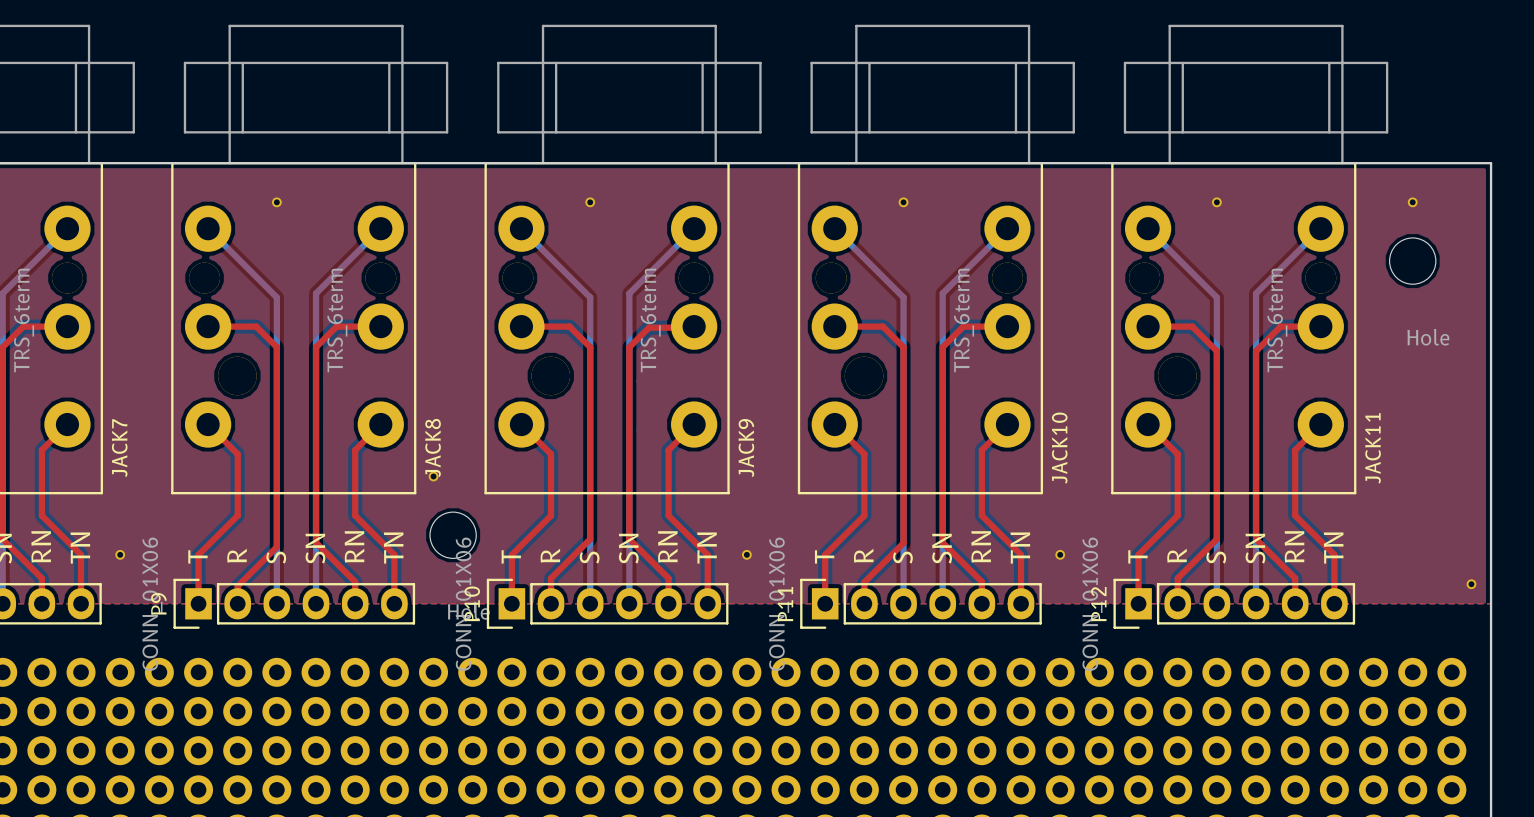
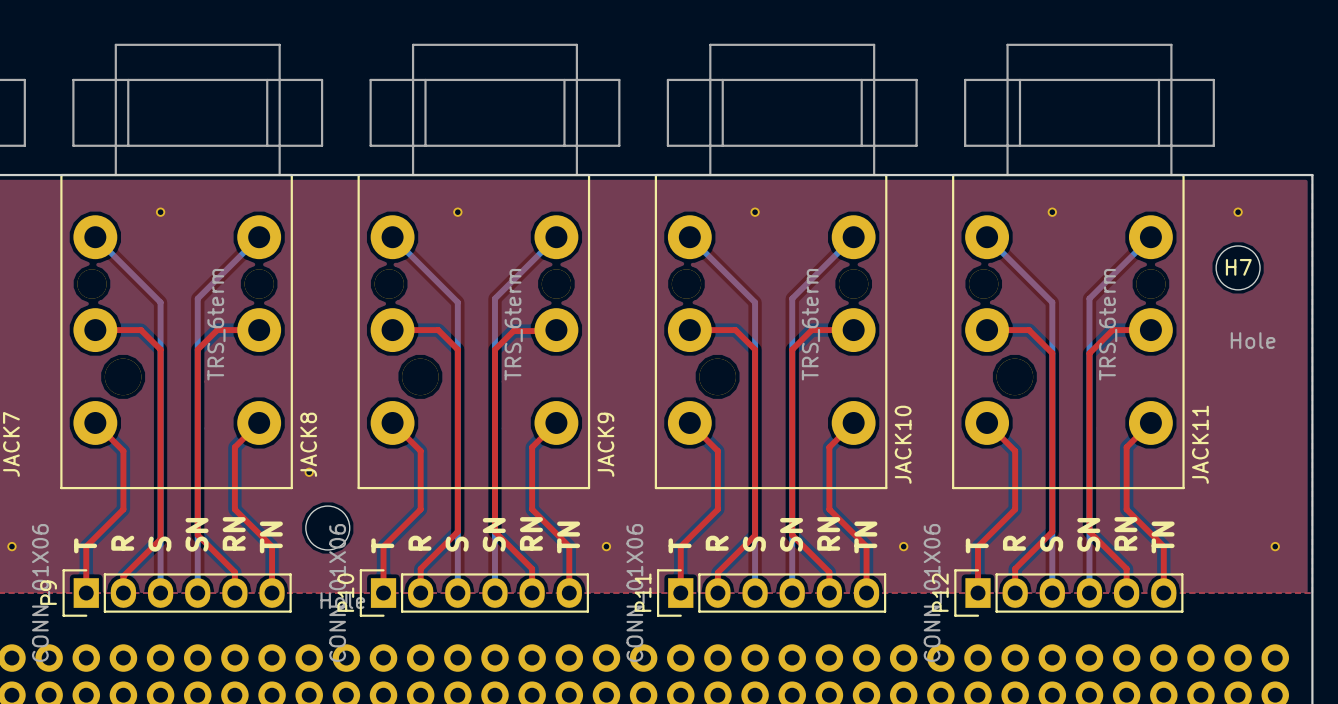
H7 name: none -> H7 (1238, 267)
part position: (1471, 584) -> (1275, 546)

